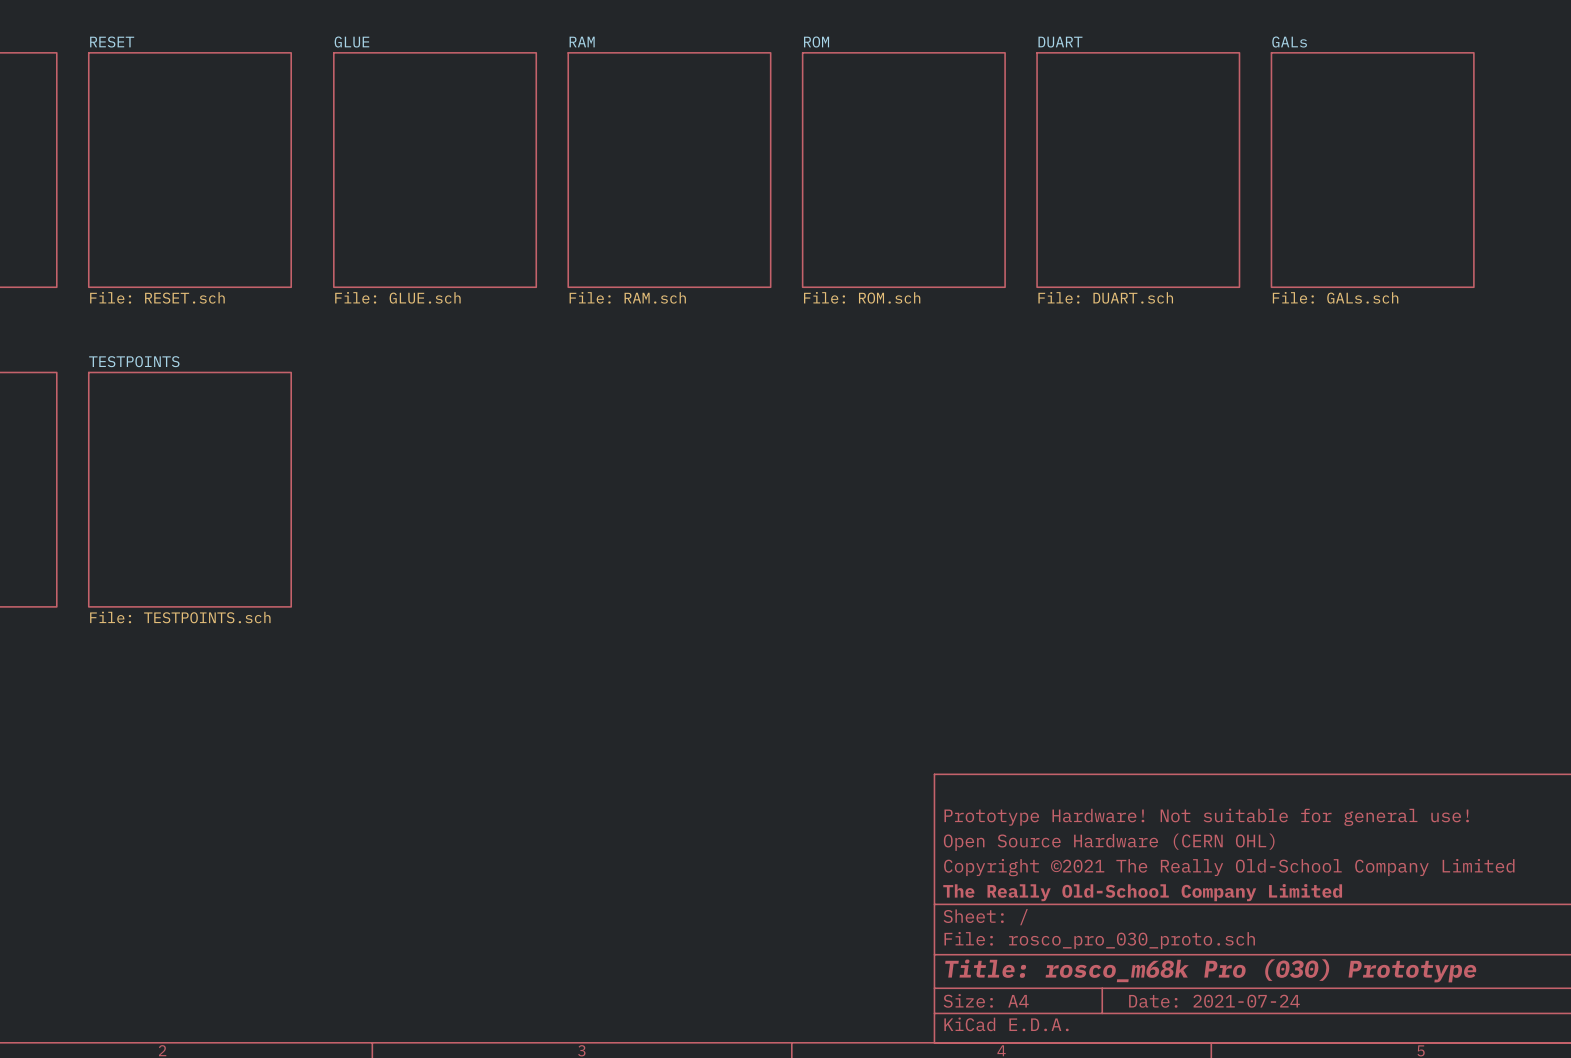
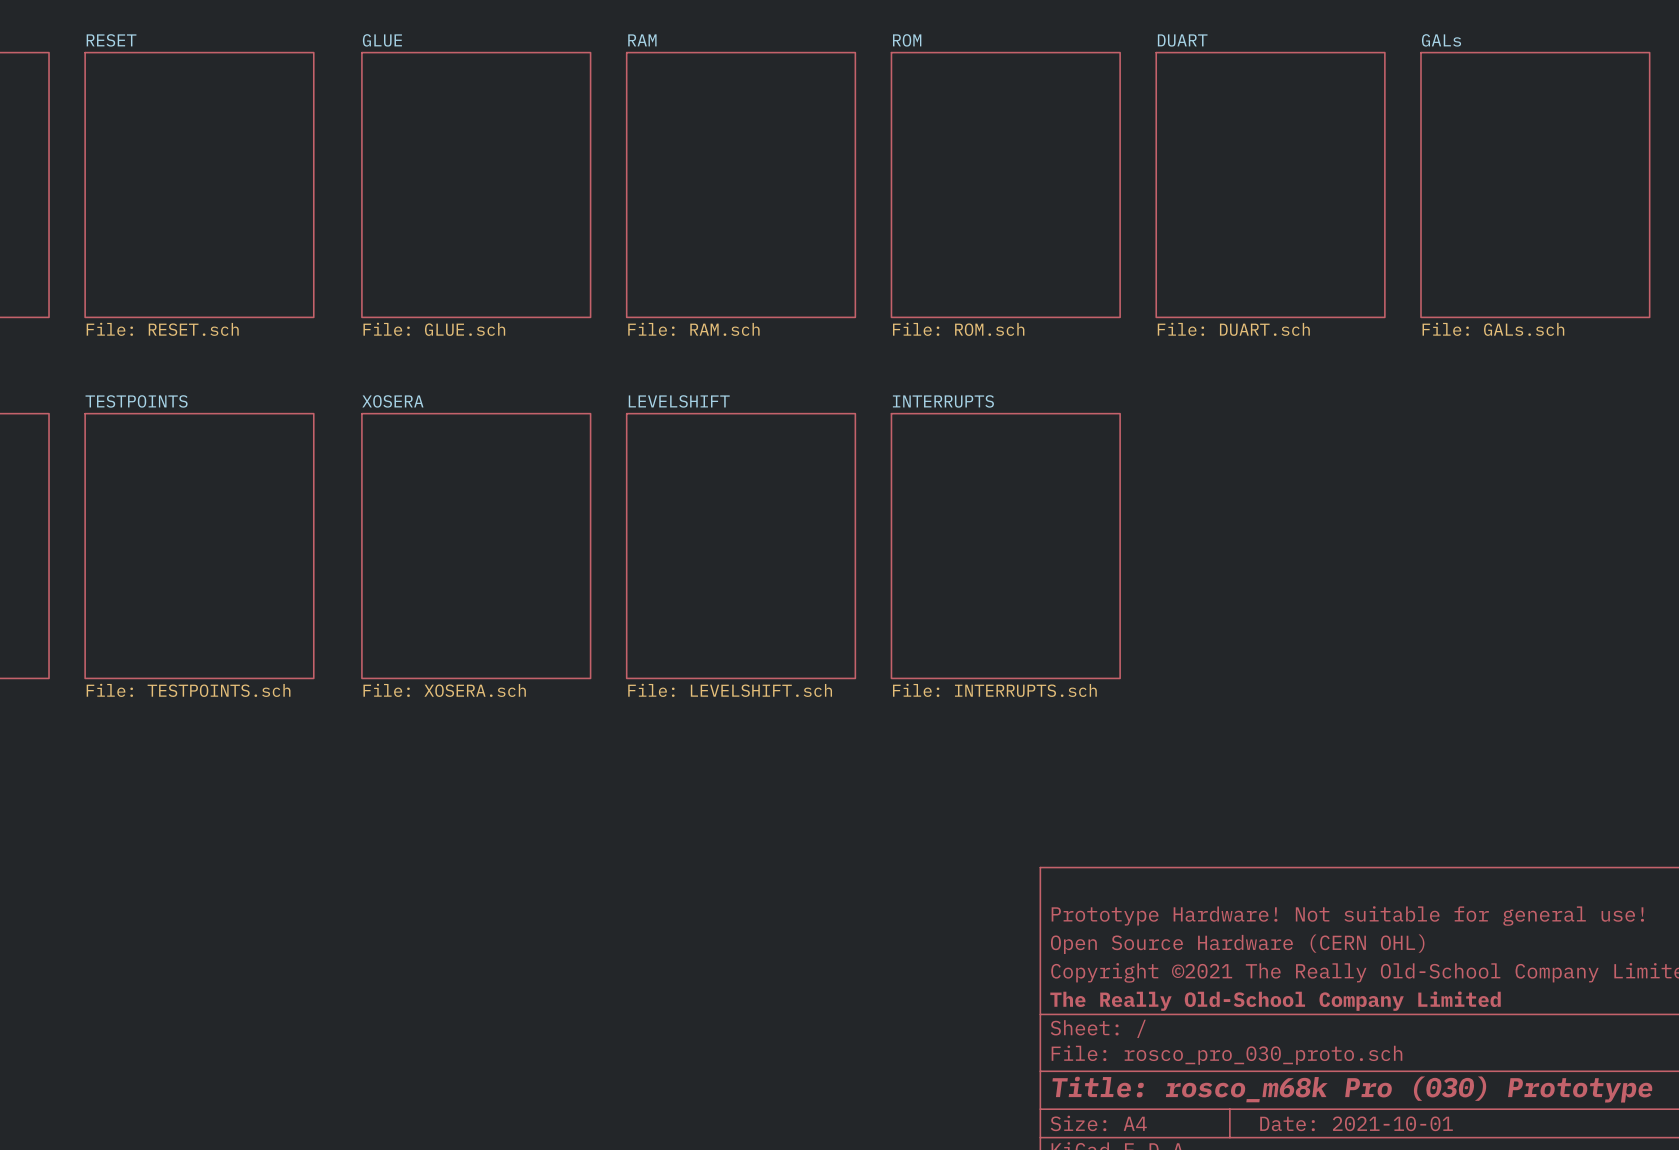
sheet XOSERA: none -> File: XOSERA.sch (476, 546)
sheet LEVELSHIFT: none -> File: LEVELSHIFT.sch (741, 546)
sheet INTERRUPTS: none -> File: INTERRUPTS.sch (1005, 546)
title block: Date: 2021-07-24 (1214, 1001) -> Date: 2021-10-01 (1356, 1123)

